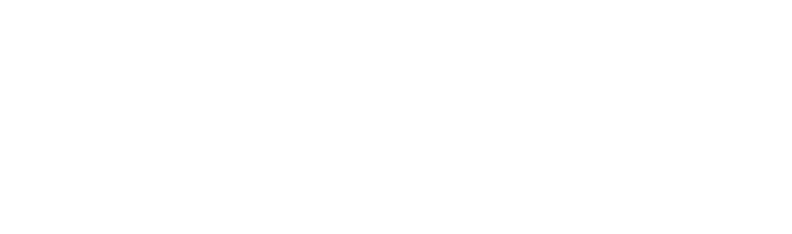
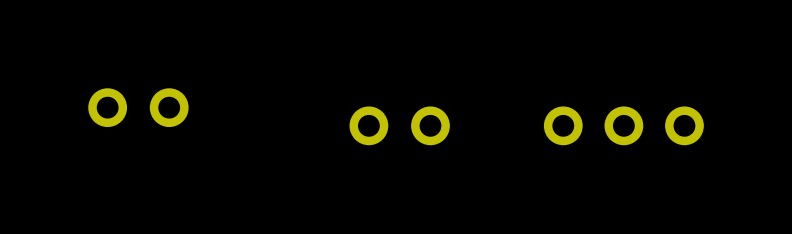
part: none -> (138, 107)
part: none -> (399, 125)
part: none -> (623, 125)

